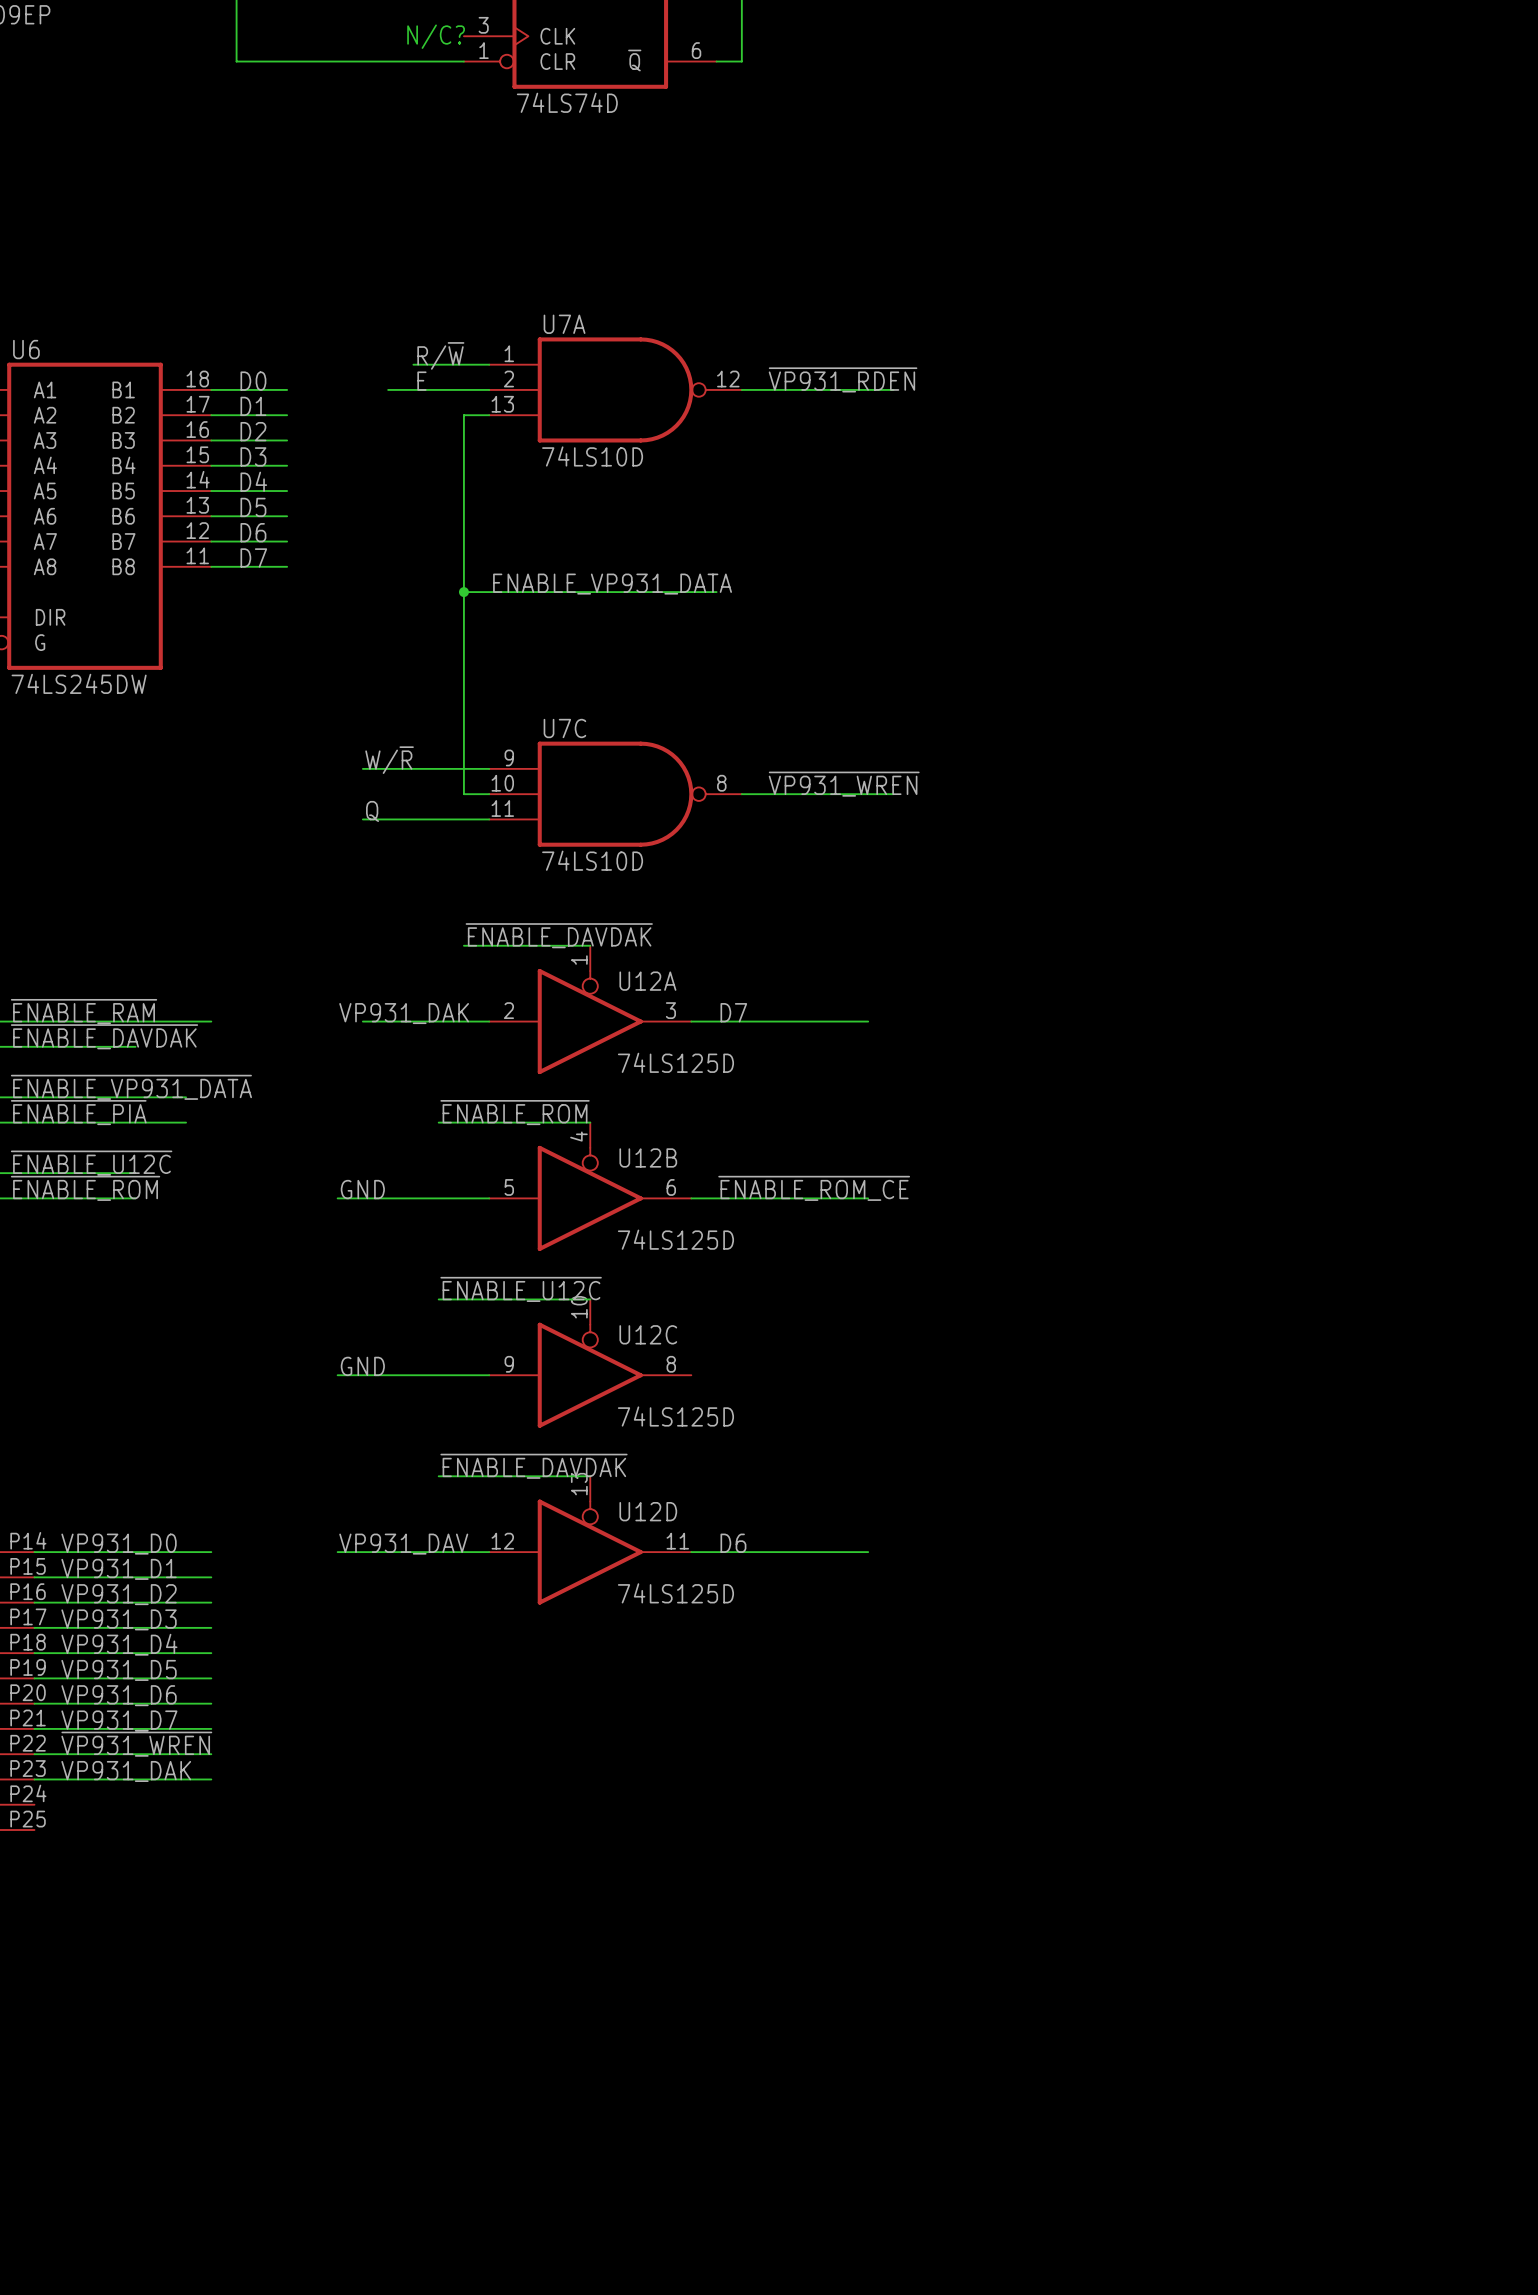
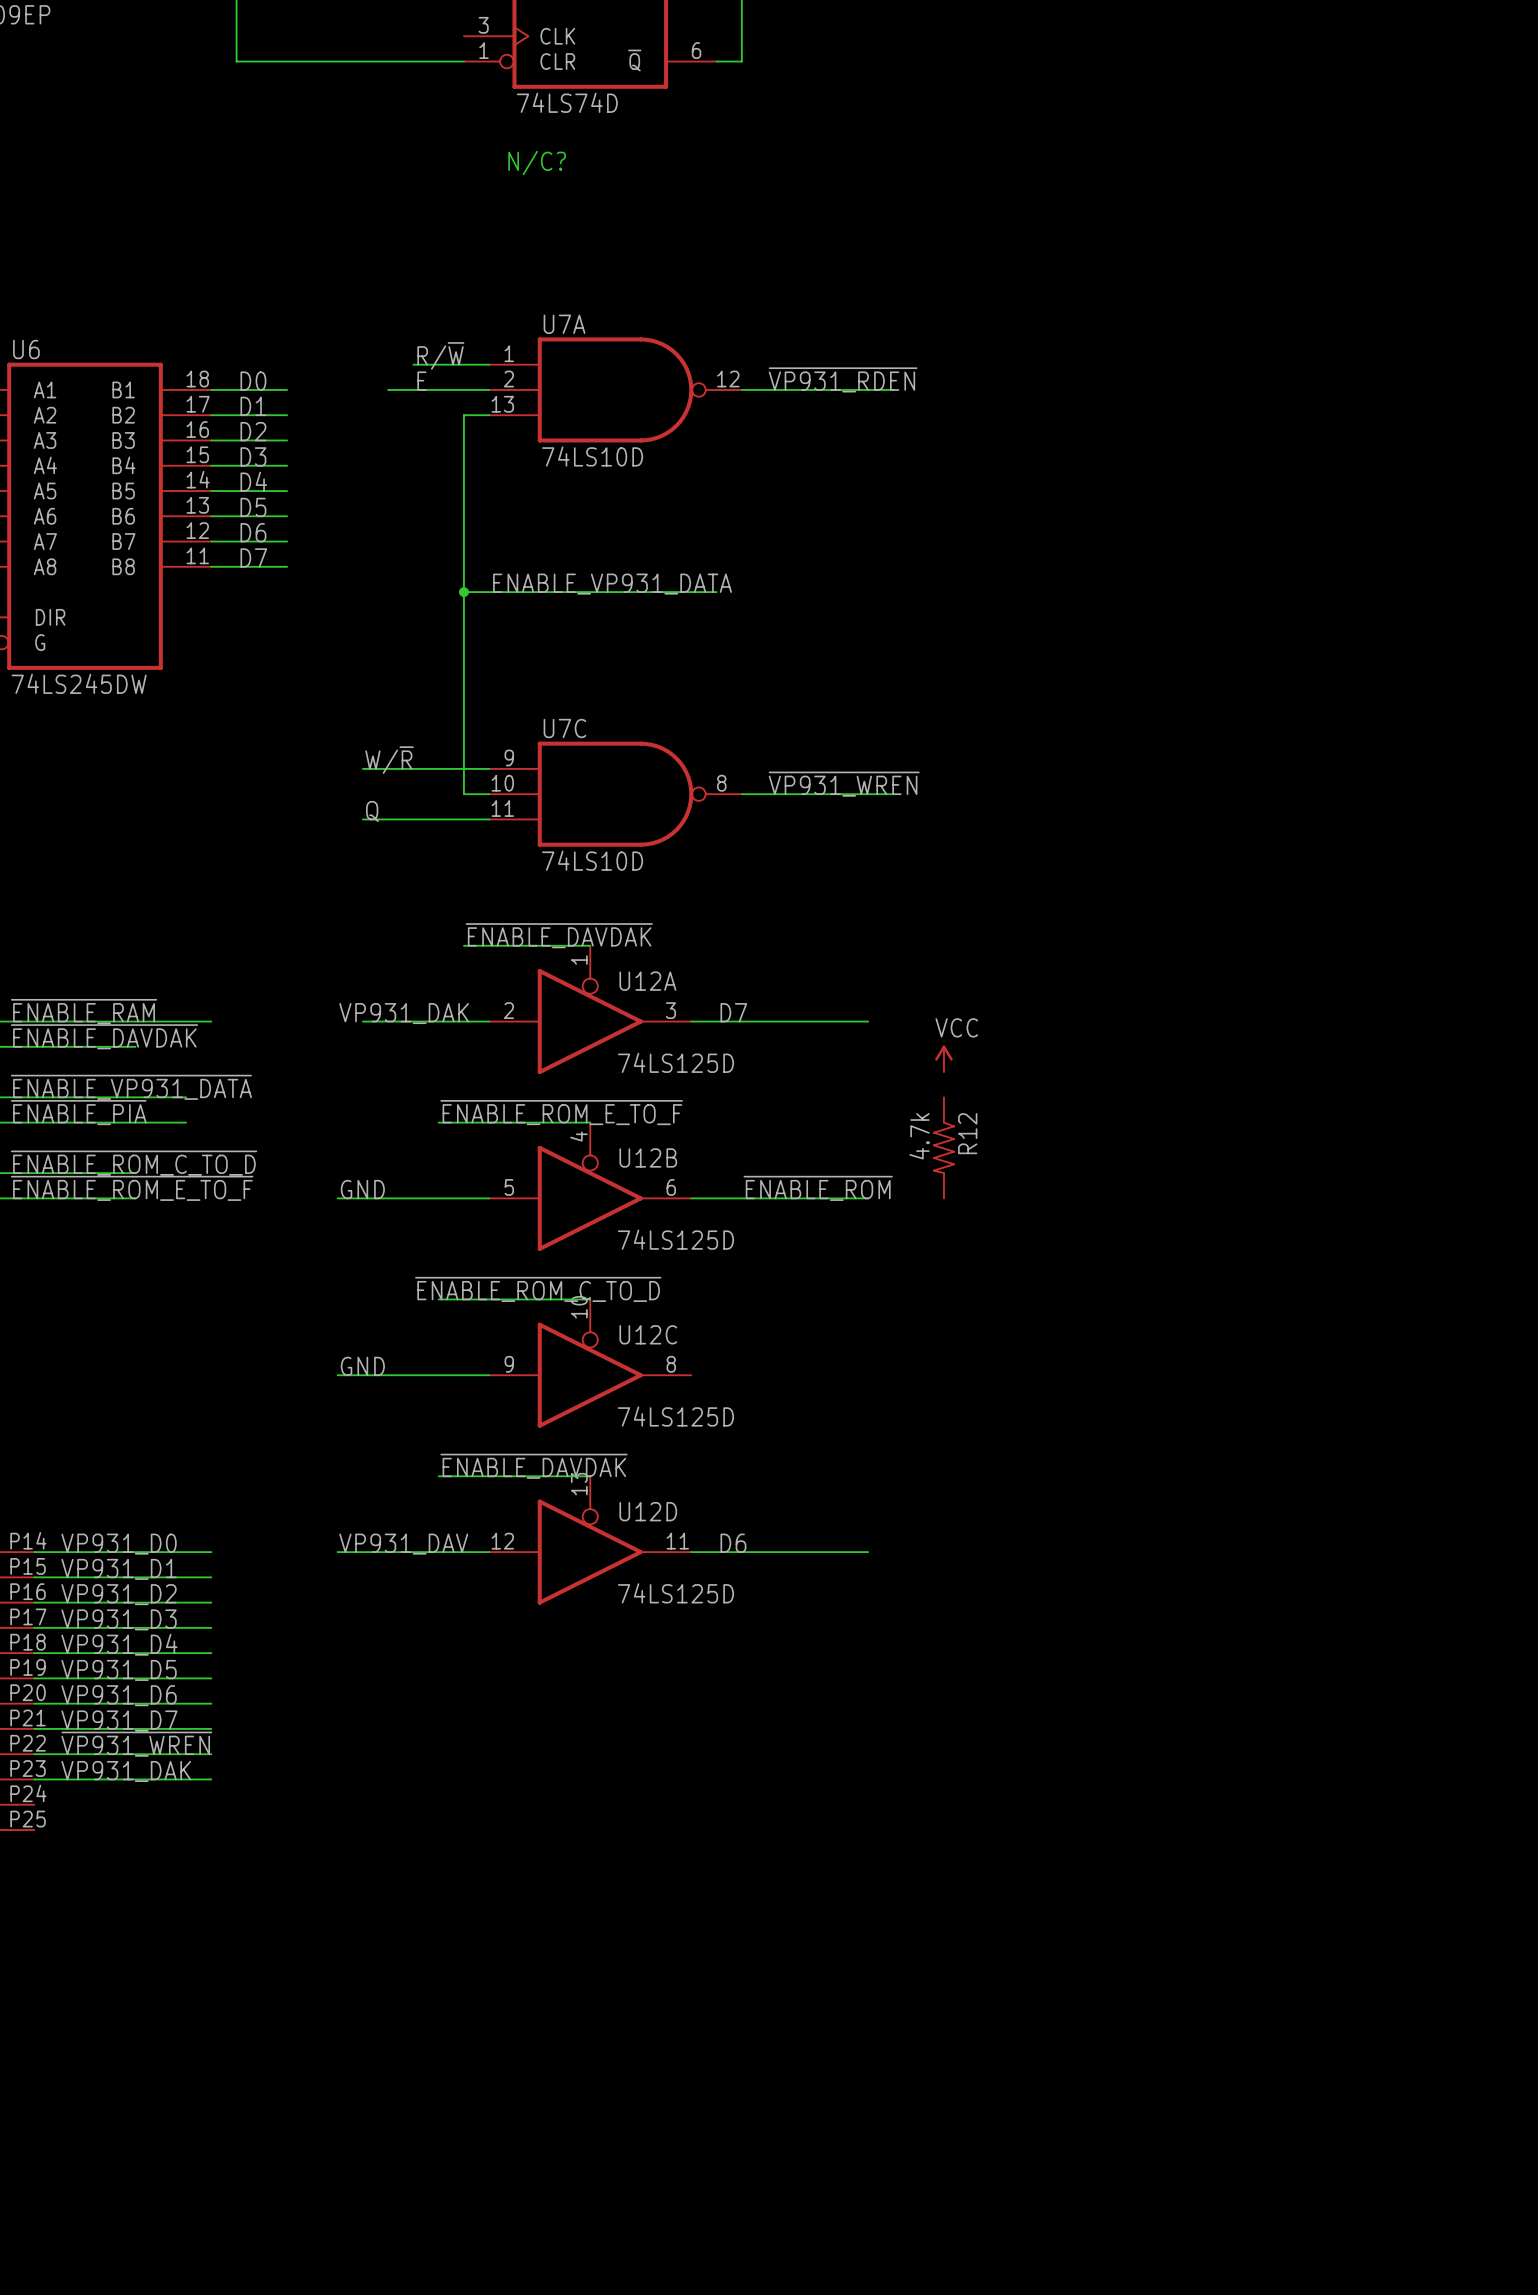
text position: N/C? (436, 36) -> N/C? (537, 163)
power symbol: none -> VCC (943, 1058)
label: ~{ENABLE_ROM} (515, 1112) -> ~{ENABLE_ROM_E_TO_F} (561, 1112)
R12: none -> 4.7k (943, 1147)
label: ~{ENABLE_U12C} (91, 1163) -> ~{ENABLE_ROM_C_TO_D} (134, 1163)
label: ~{ENABLE_ROM} (85, 1188) -> ~{ENABLE_ROM_E_TO_F} (132, 1188)
label: ~{ENABLE_ROM_CE} (814, 1188) -> ~{ENABLE_ROM} (818, 1188)
label: ~{ENABLE_U12C} (521, 1289) -> ~{ENABLE_ROM_C_TO_D} (538, 1289)

